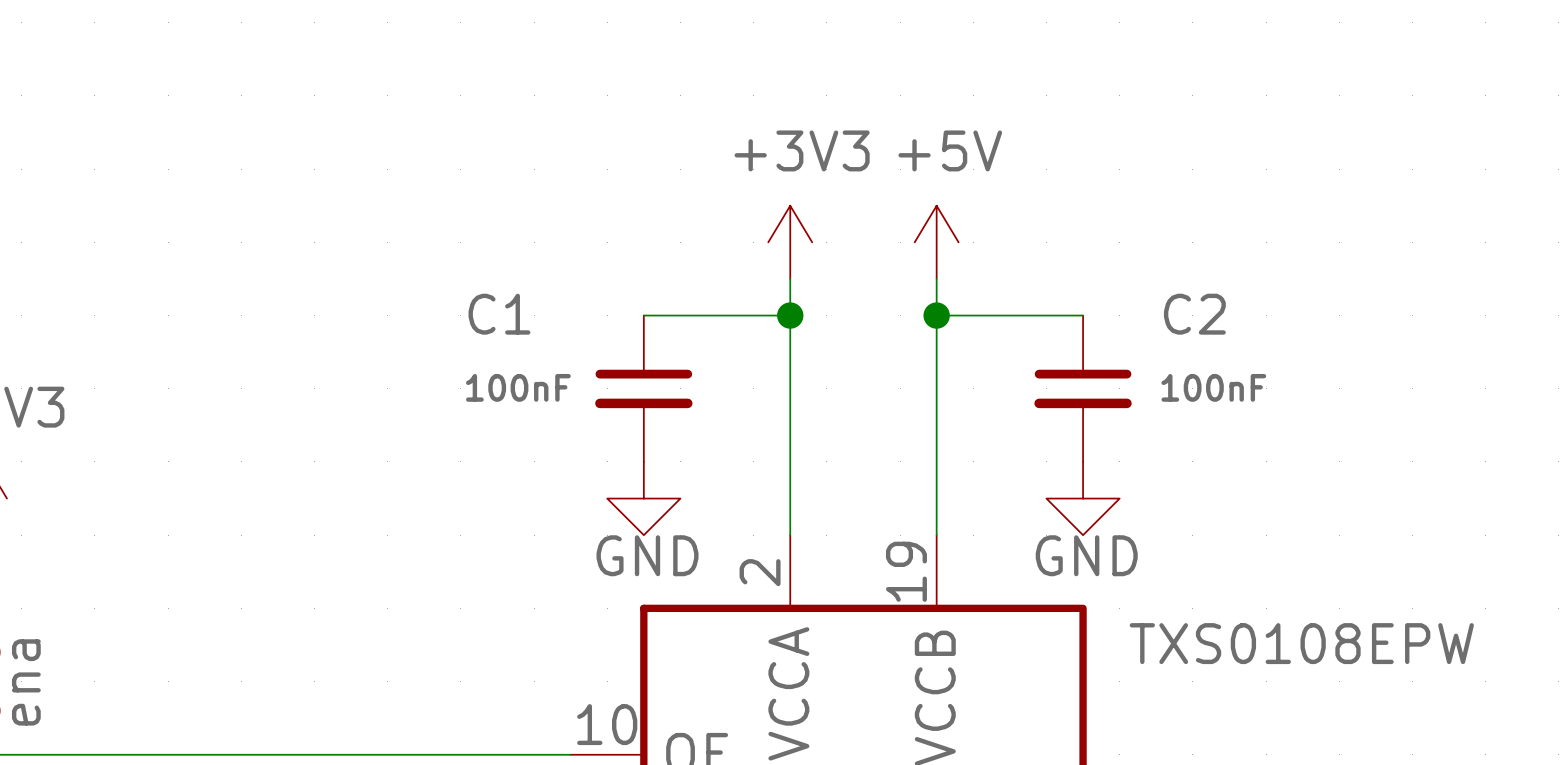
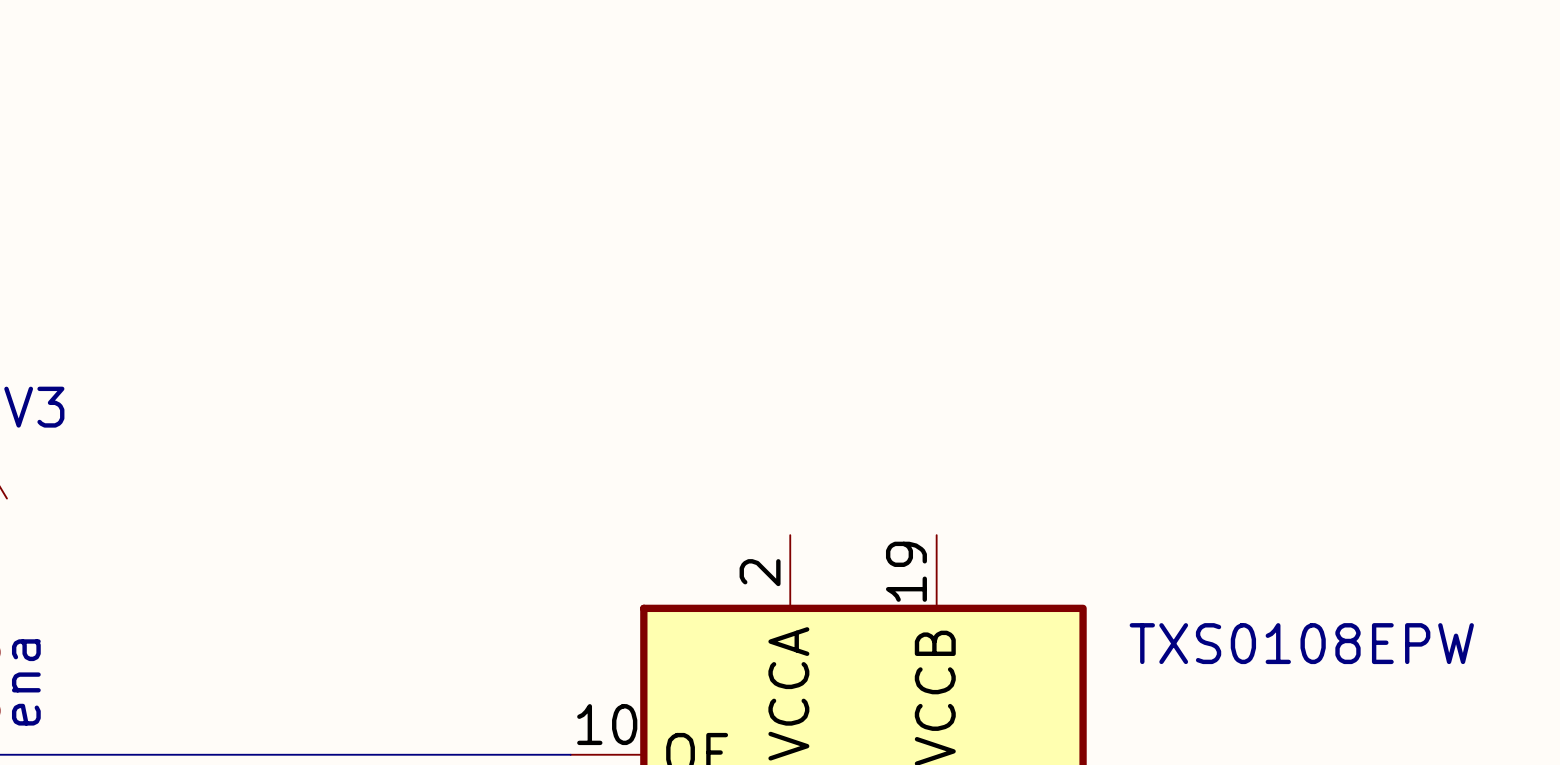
power symbol: +3V3 (790, 242) -> none
power symbol: +5V (936, 242) -> none
wire: (790, 278) (790, 535) -> none
wire: (936, 278) (936, 535) -> none
wire: (643, 315) (790, 315) -> none
junction: (790, 315) -> none
wire: (936, 315) (1083, 315) -> none
junction: (936, 315) -> none
C1: 100nF (643, 388) -> none
C2: 100nF (1083, 388) -> none
power symbol: GND (643, 498) -> none
power symbol: GND (1083, 498) -> none

